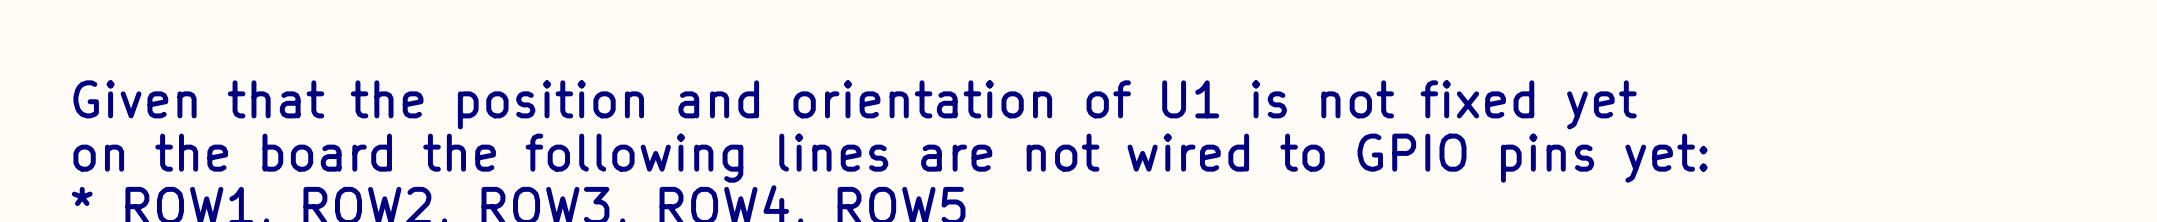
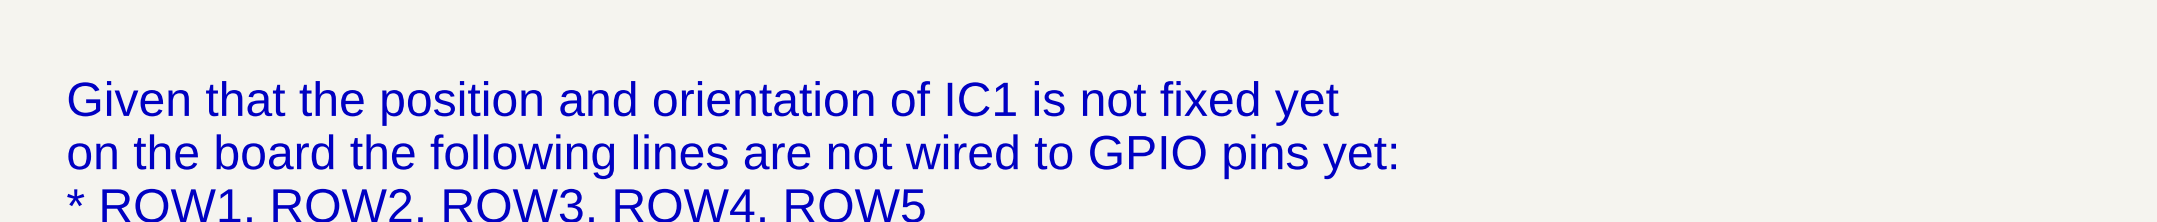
text: Given that the position and orientation of U1 is not fixed yet (855, 104) -> Given that the position and orientation of IC1 is not fixed yet (703, 103)

